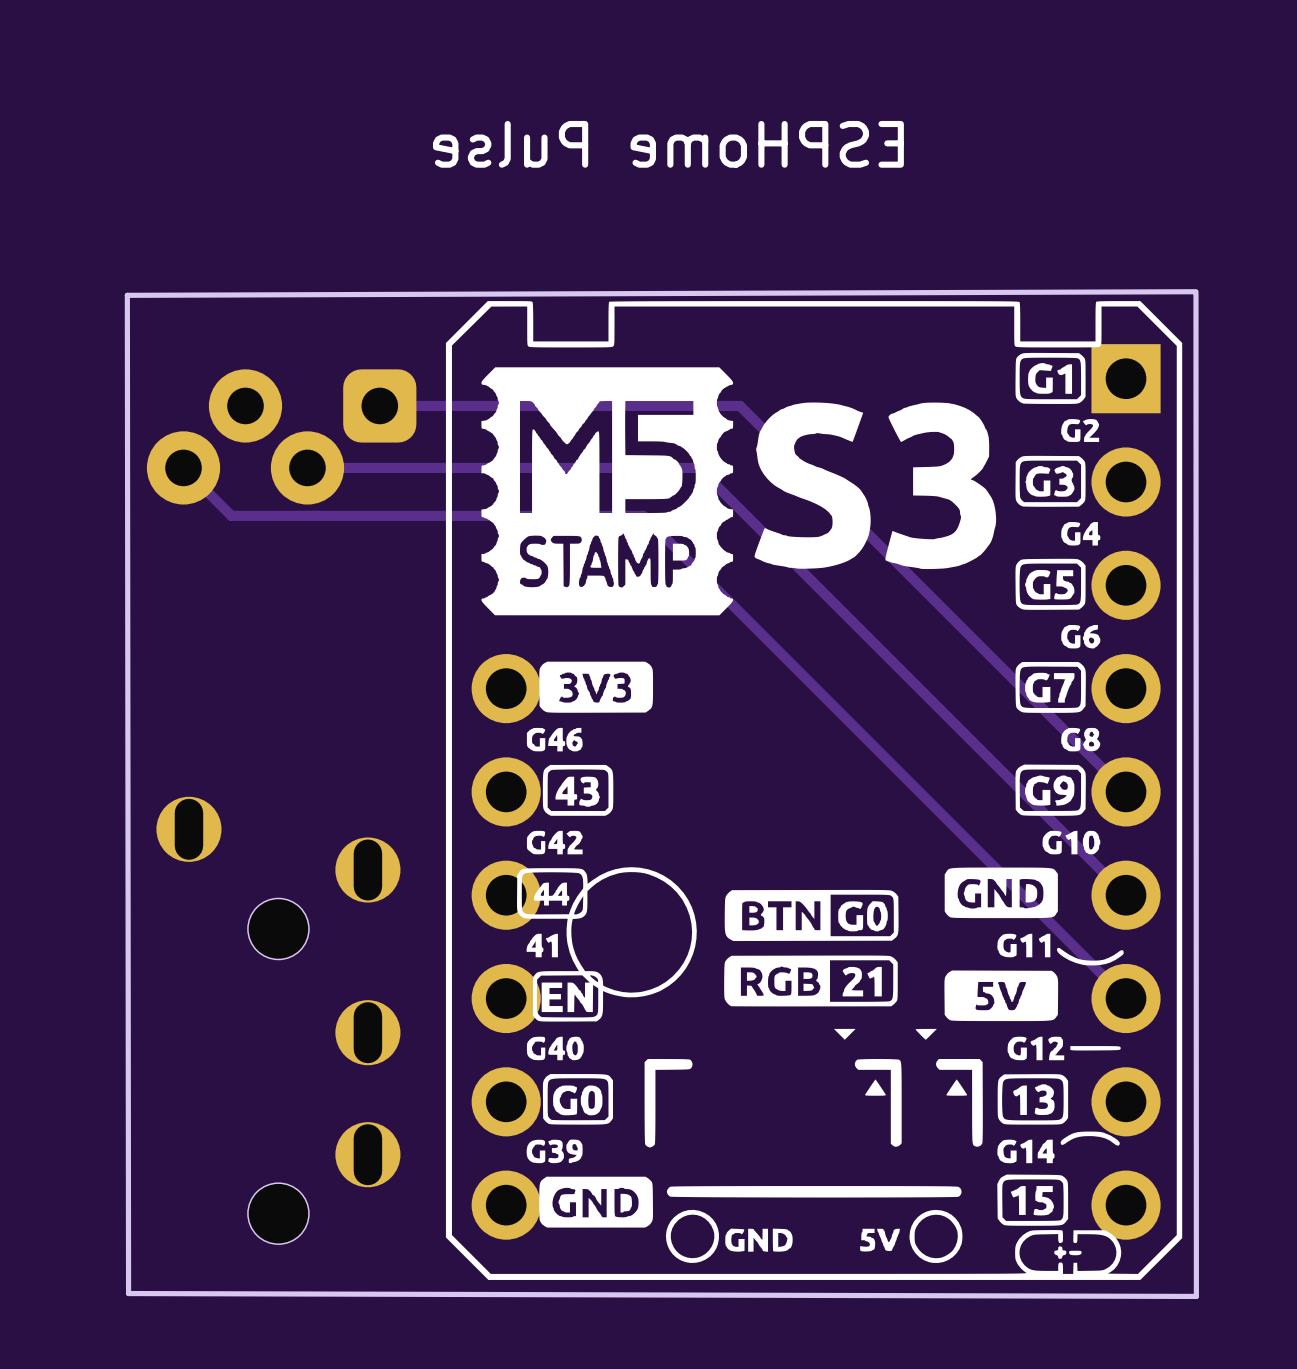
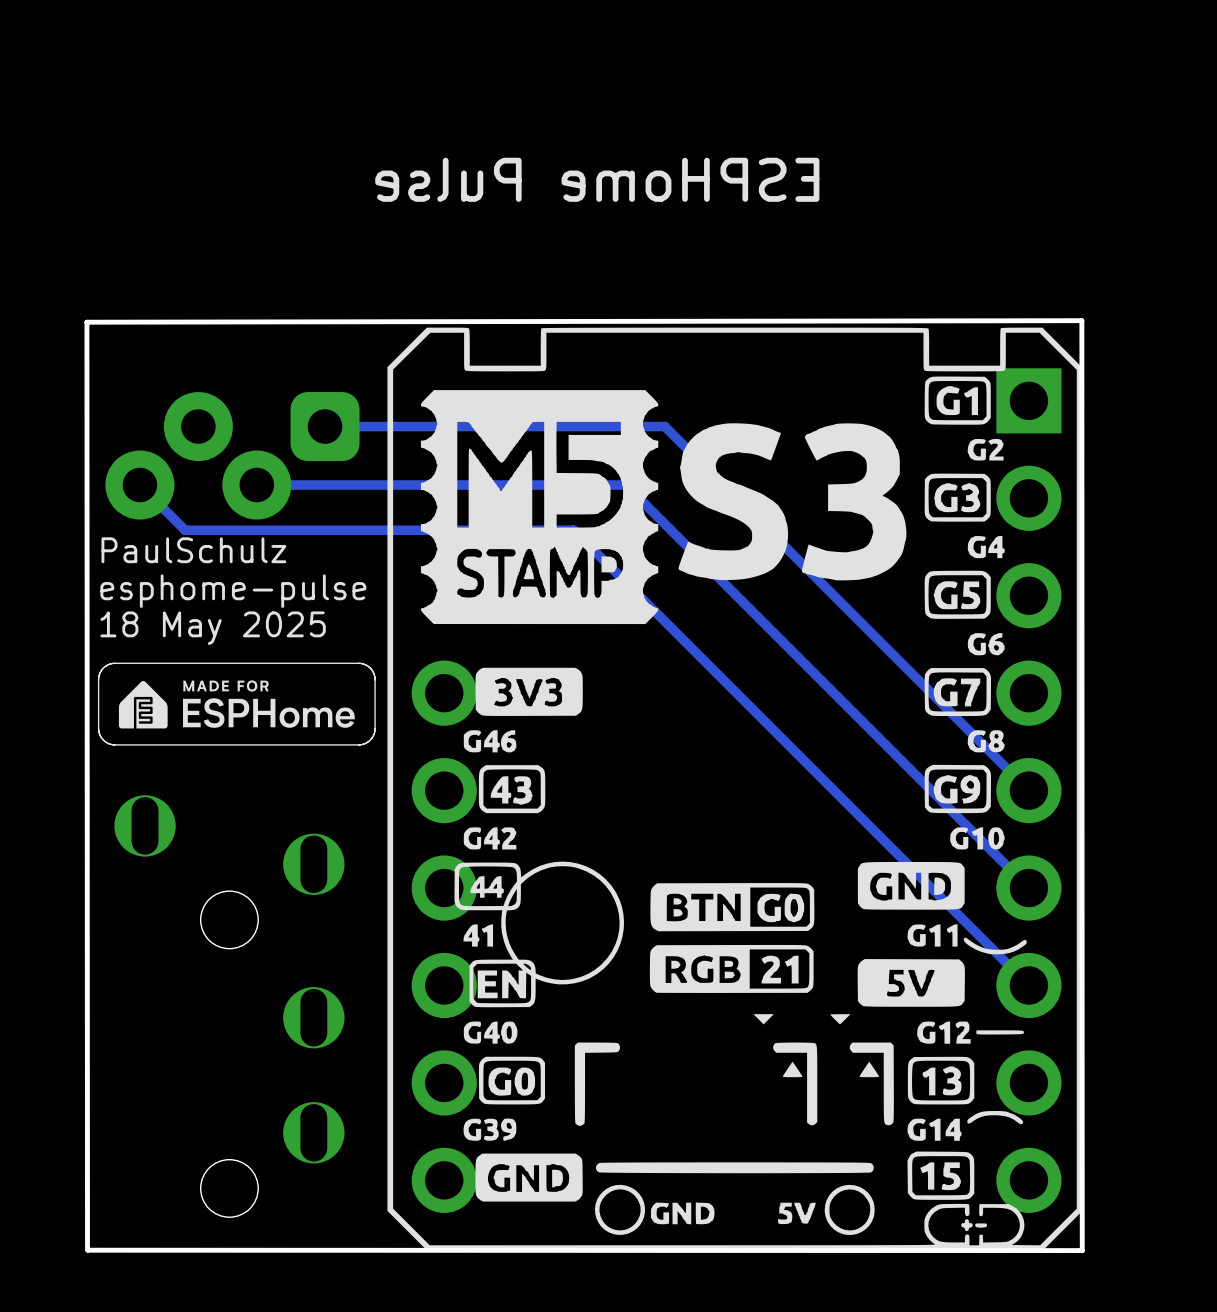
board edge: (1195, 291) (127, 295) (128, 1293) (1195, 1296) -> none
board edge: (1195, 293) (1196, 1296) -> none
text: none -> PaulSchulz (193, 550)
text: none -> esphome-pulse (233, 591)
text: none -> 18 May 2025 (213, 628)
line: none -> (360, 663) (110, 663) (102, 668) (98, 677) (99, 732) (104, 741) (114, 744) (362, 744) (370, 739) (374, 731) (375, 678) (370, 668) (360, 663)
drawing: none -> [118, 680, 355, 729]
board edge: none -> (88, 1250) (1082, 1250) (1081, 320) (86, 322) (87, 1250)

